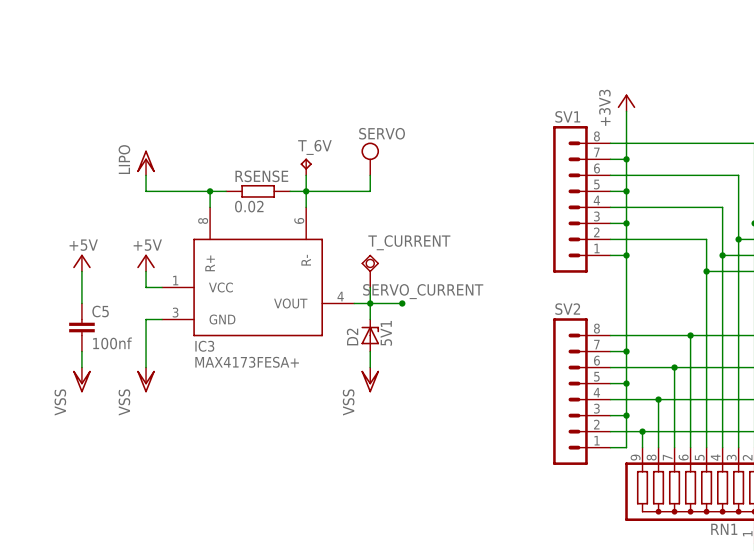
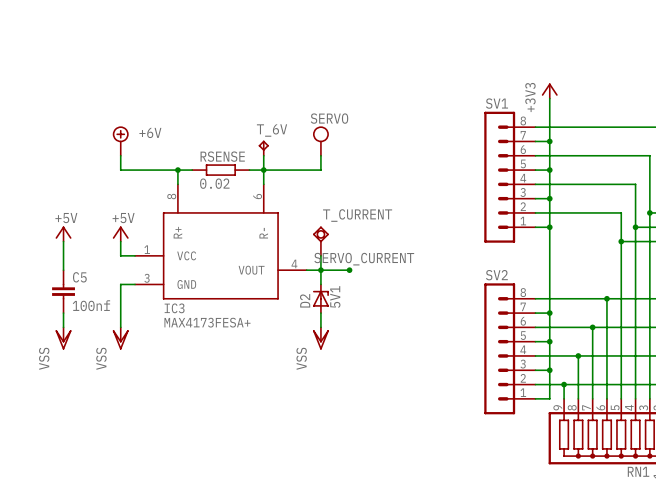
power symbol: LIPO (146, 162) -> +6V (120, 141)

